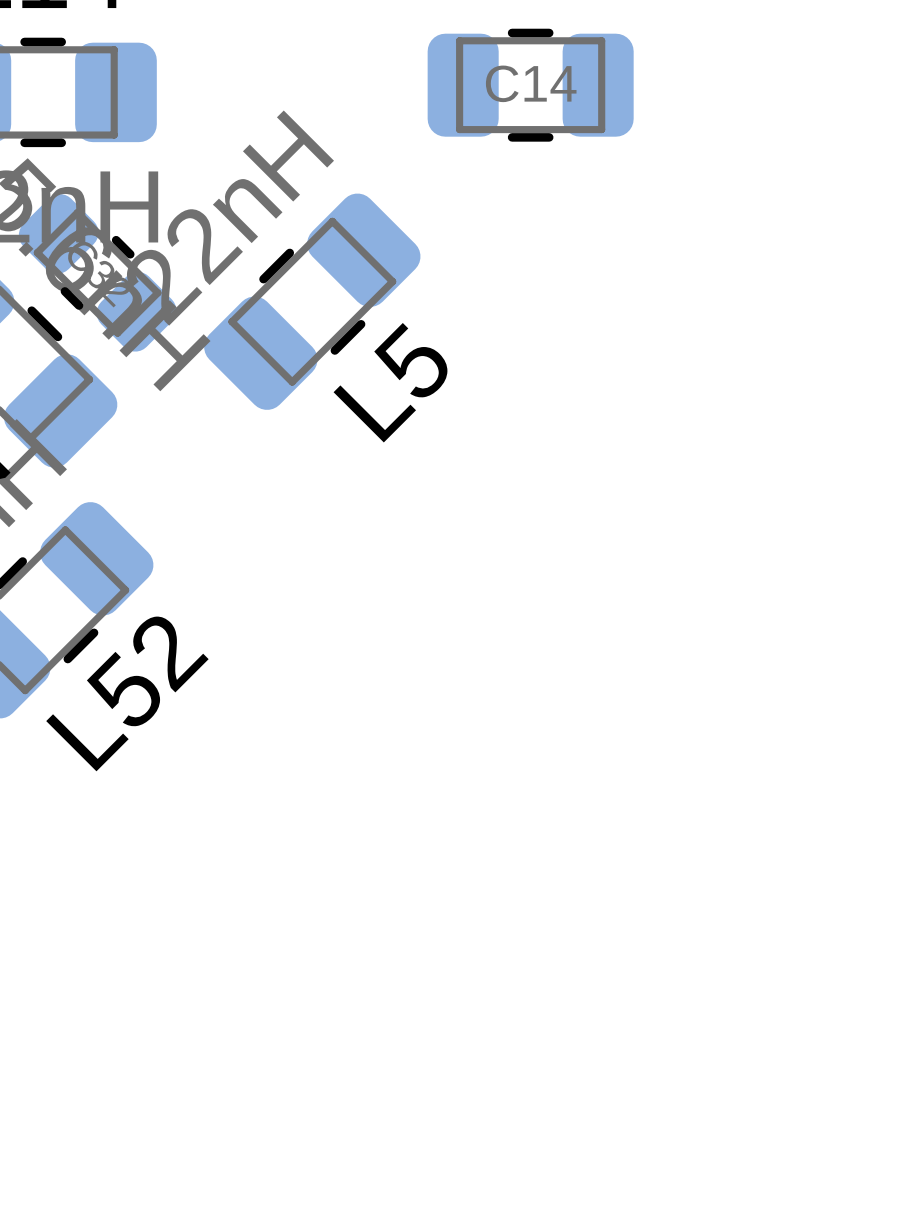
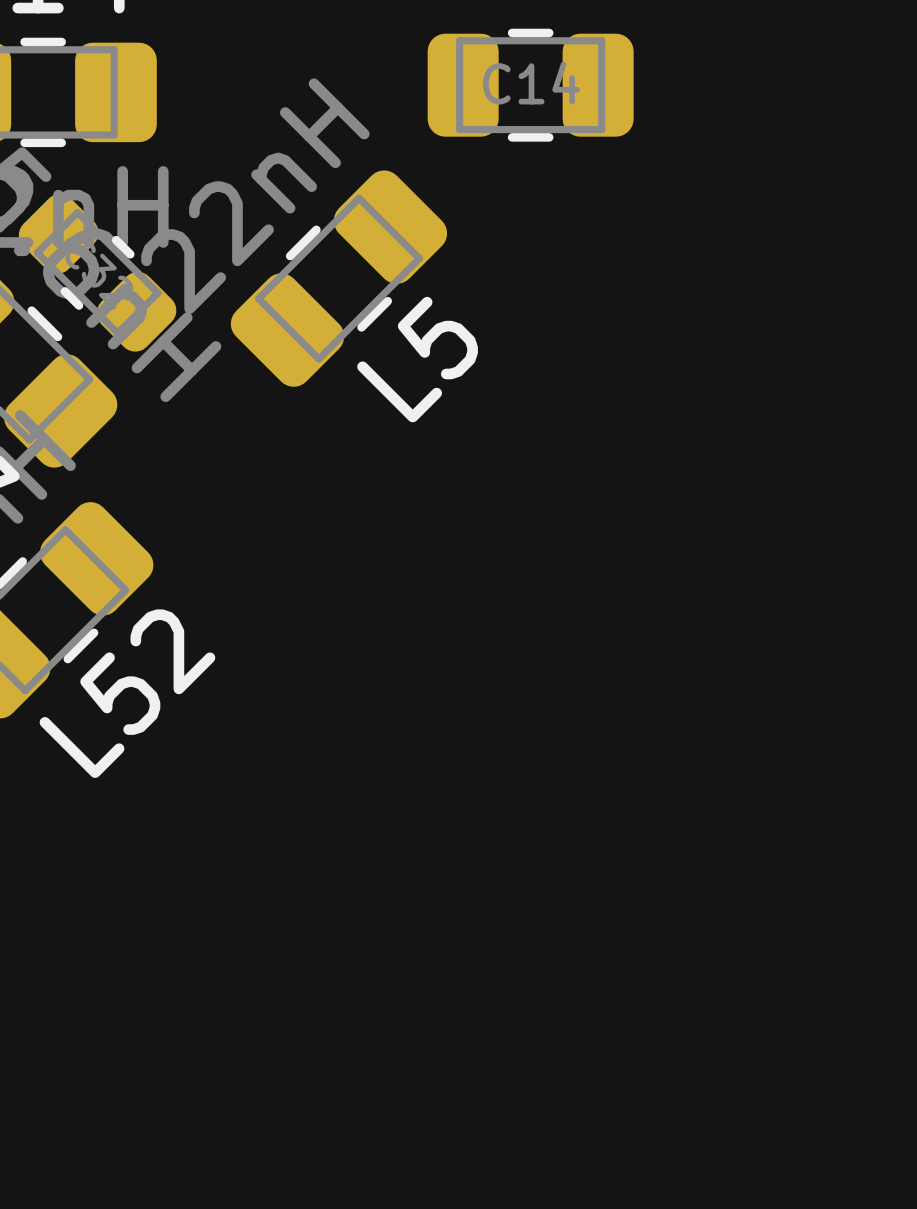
L5 position: (312, 301) -> (338, 278)

